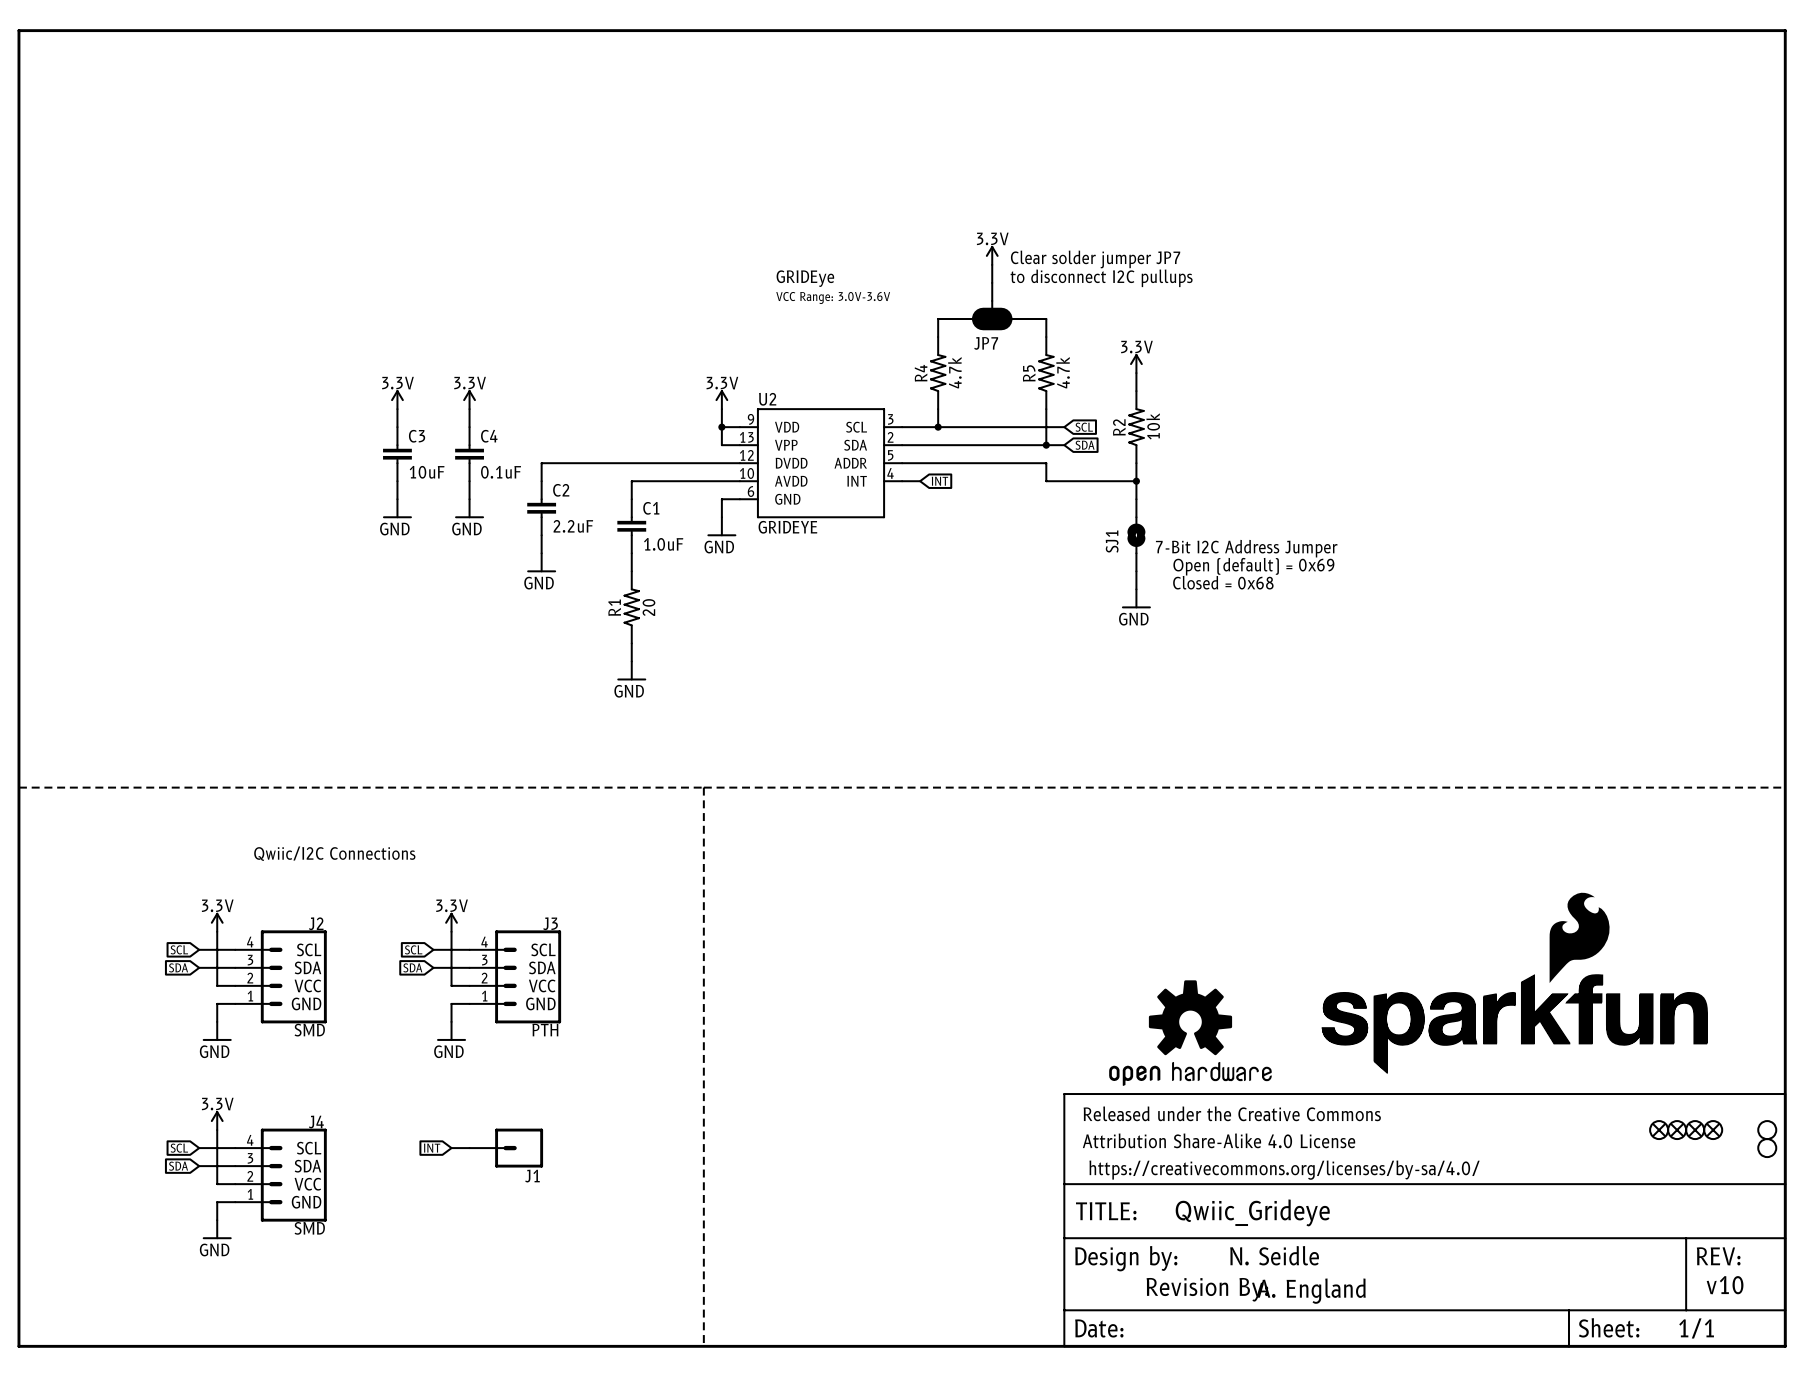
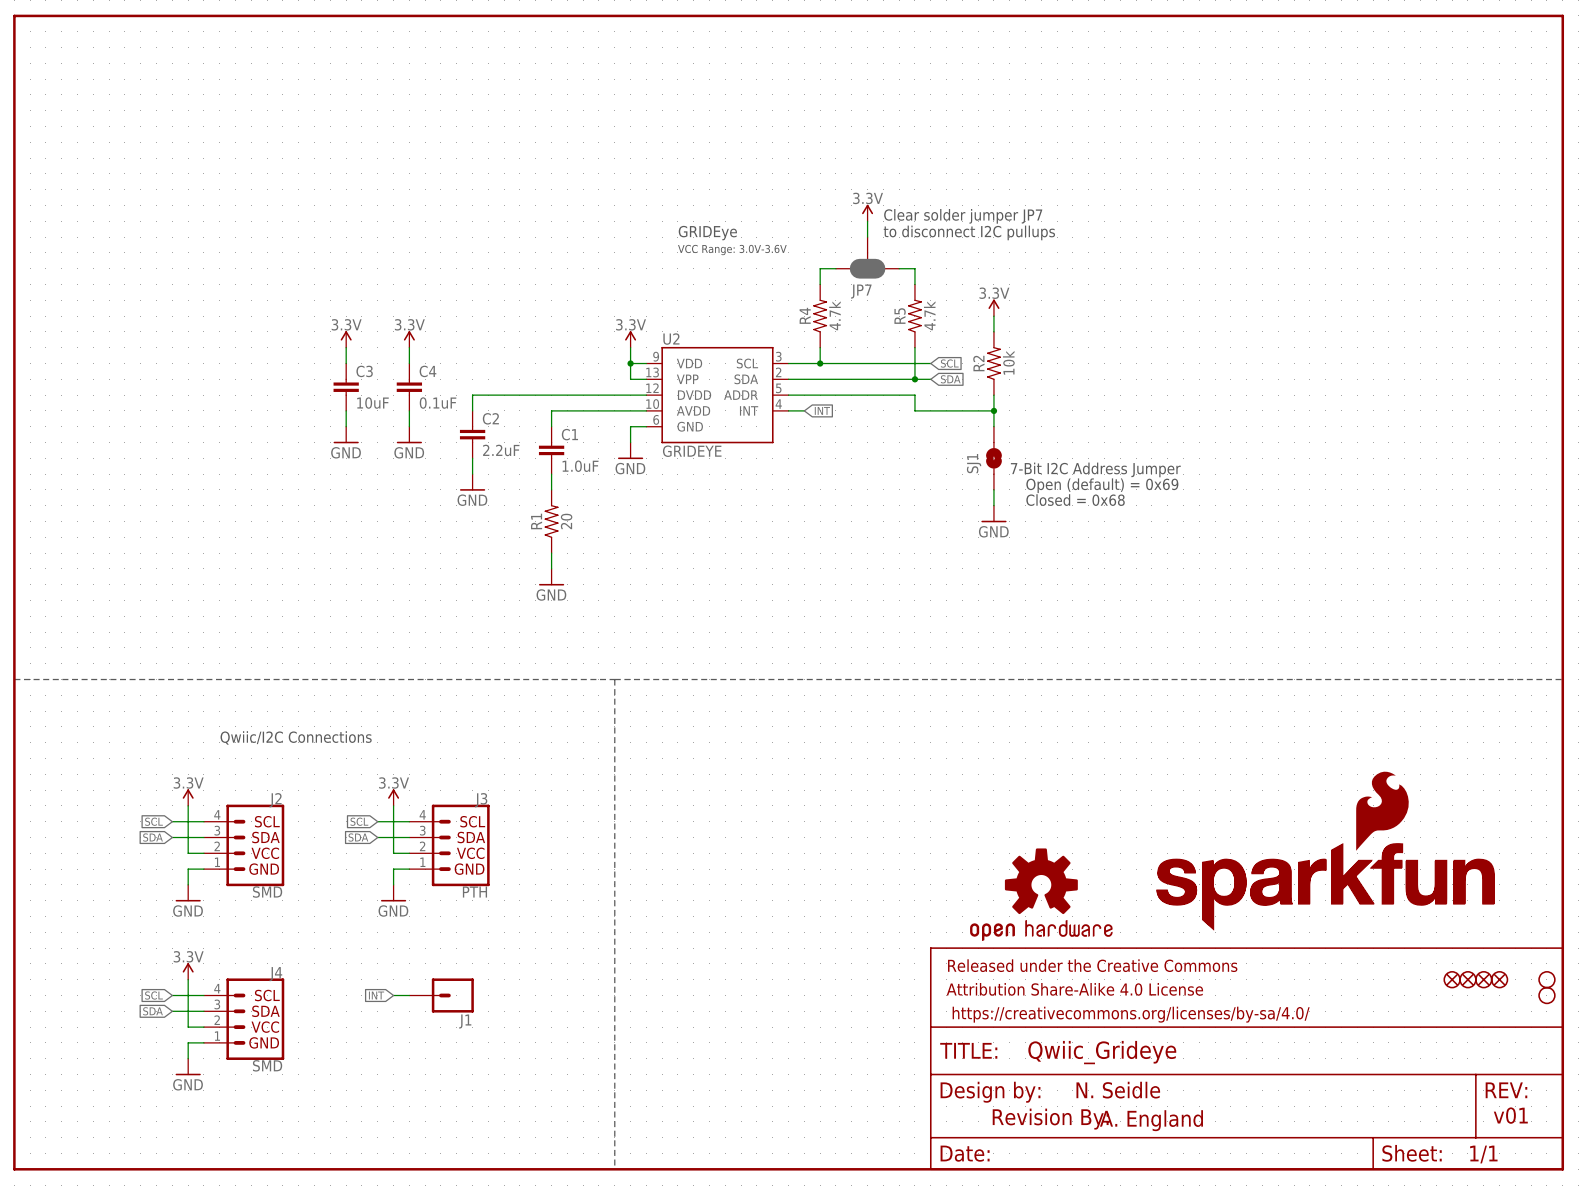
text: v10 (1725, 1285) -> v01 (1510, 1115)

